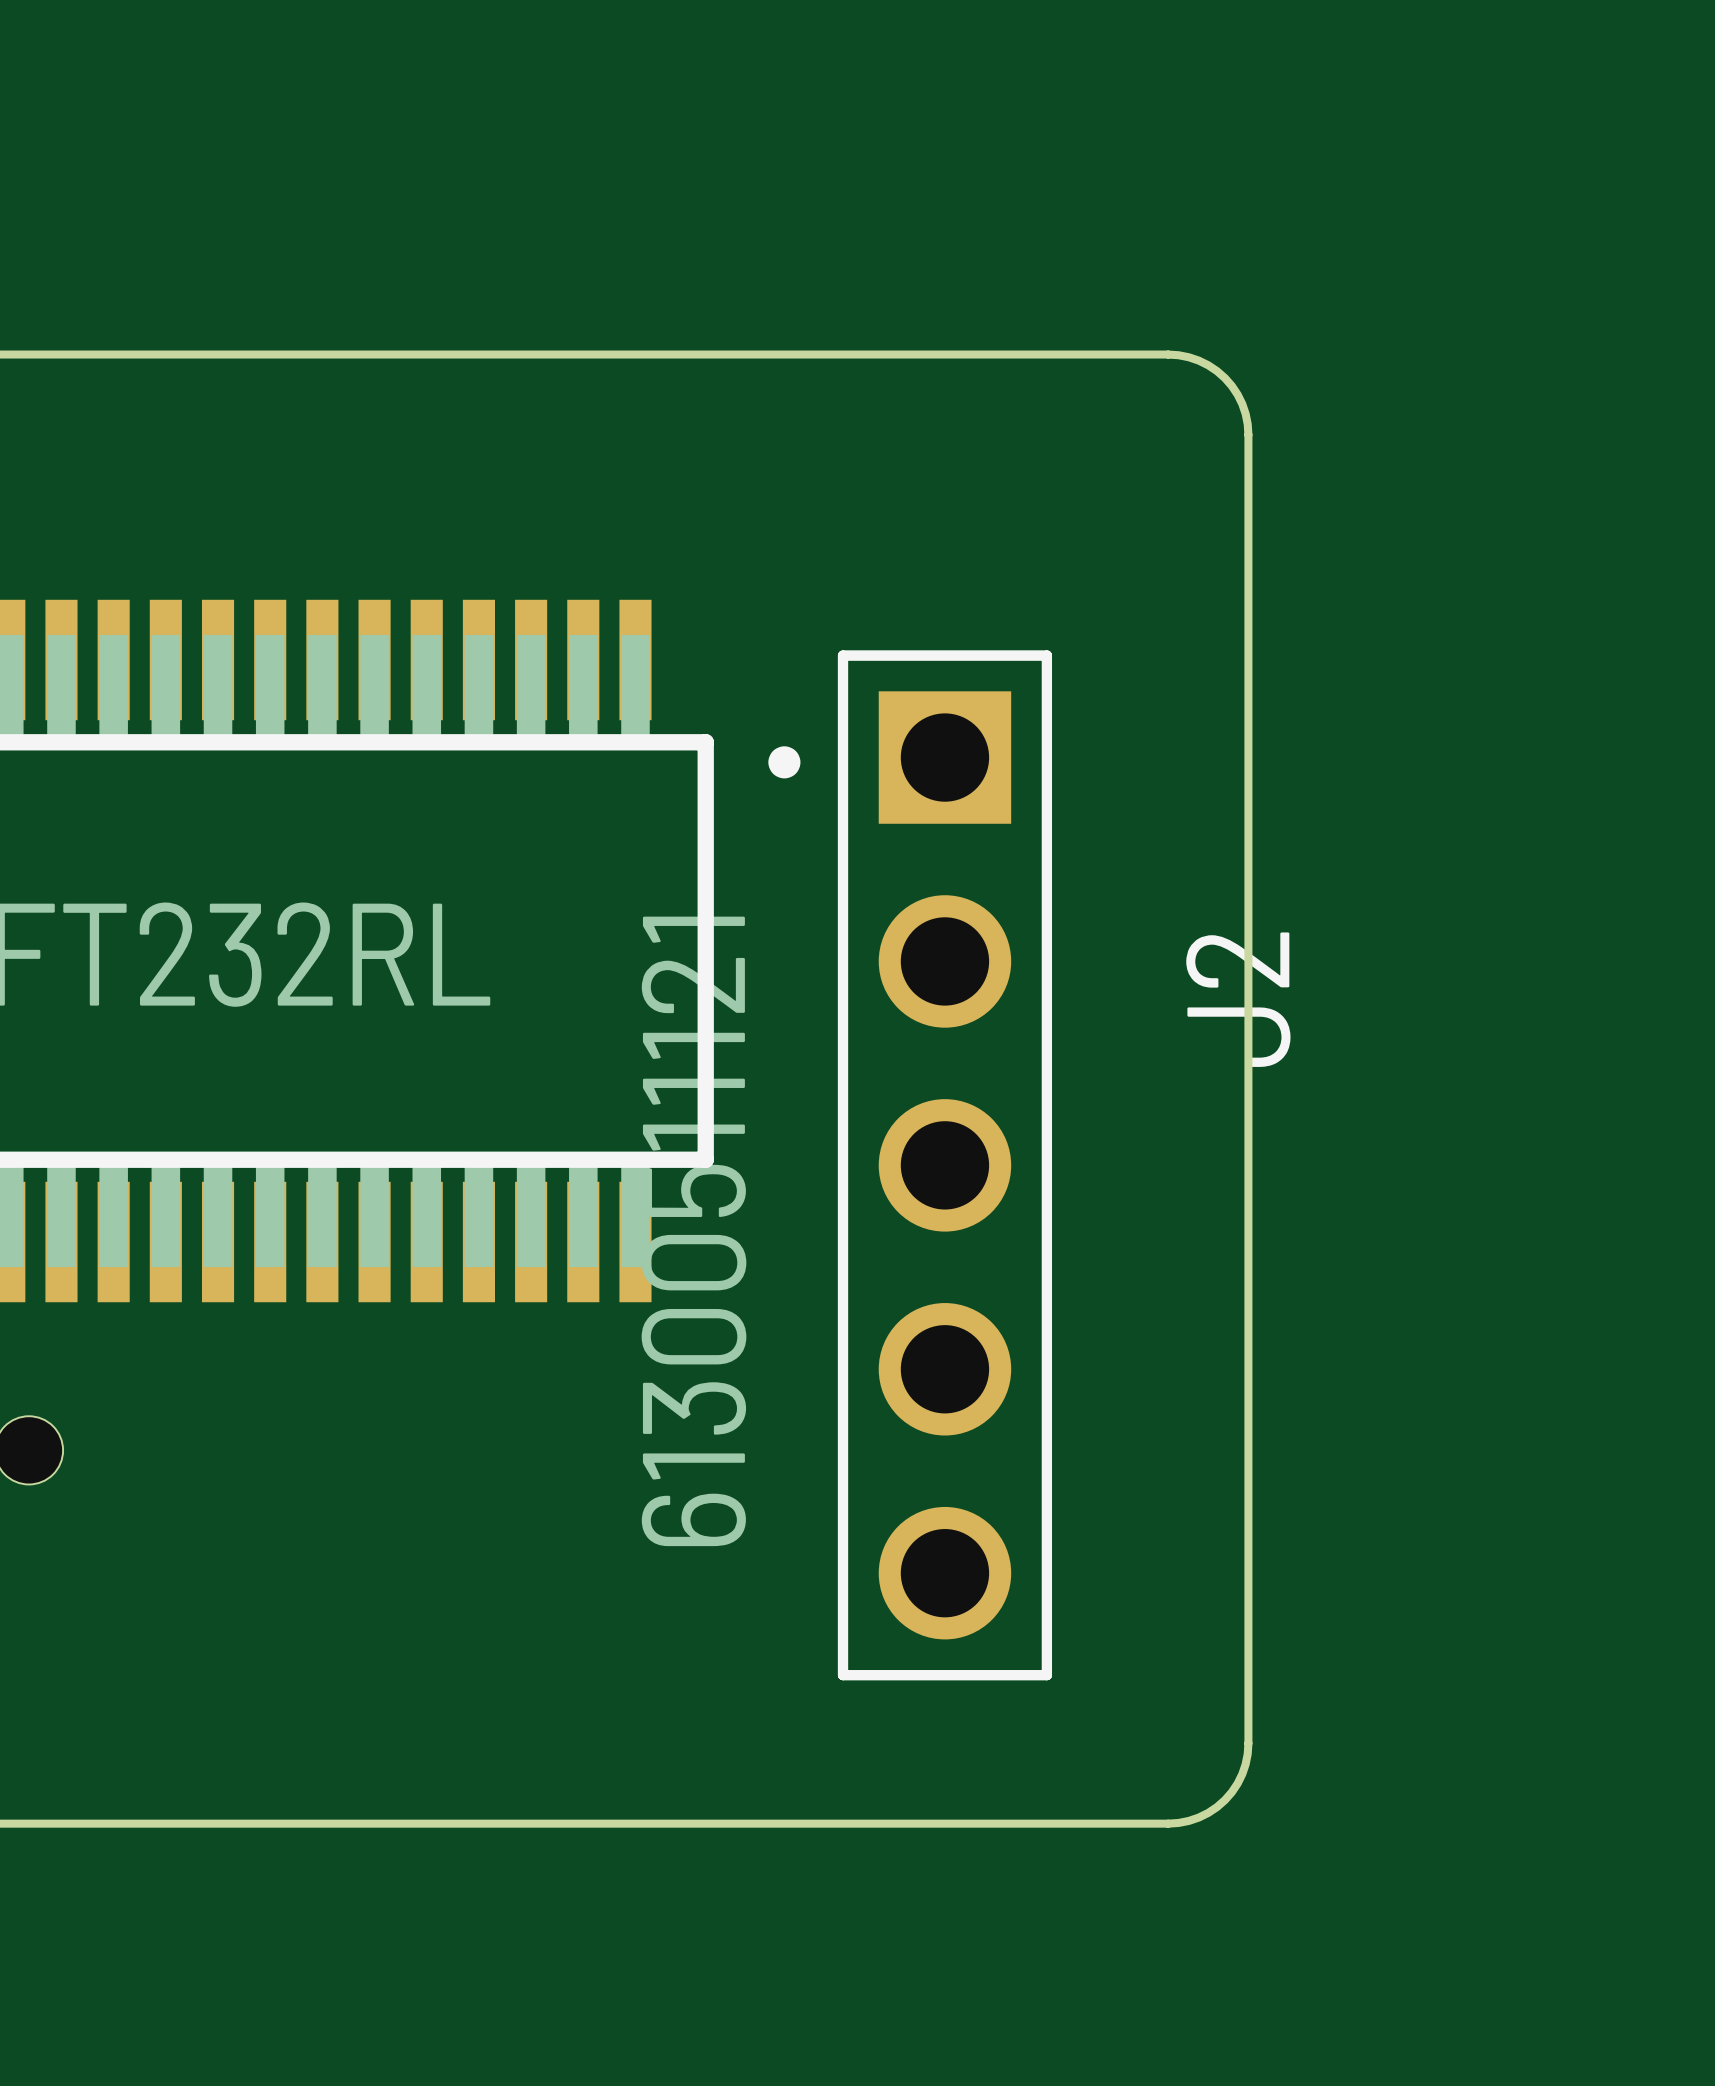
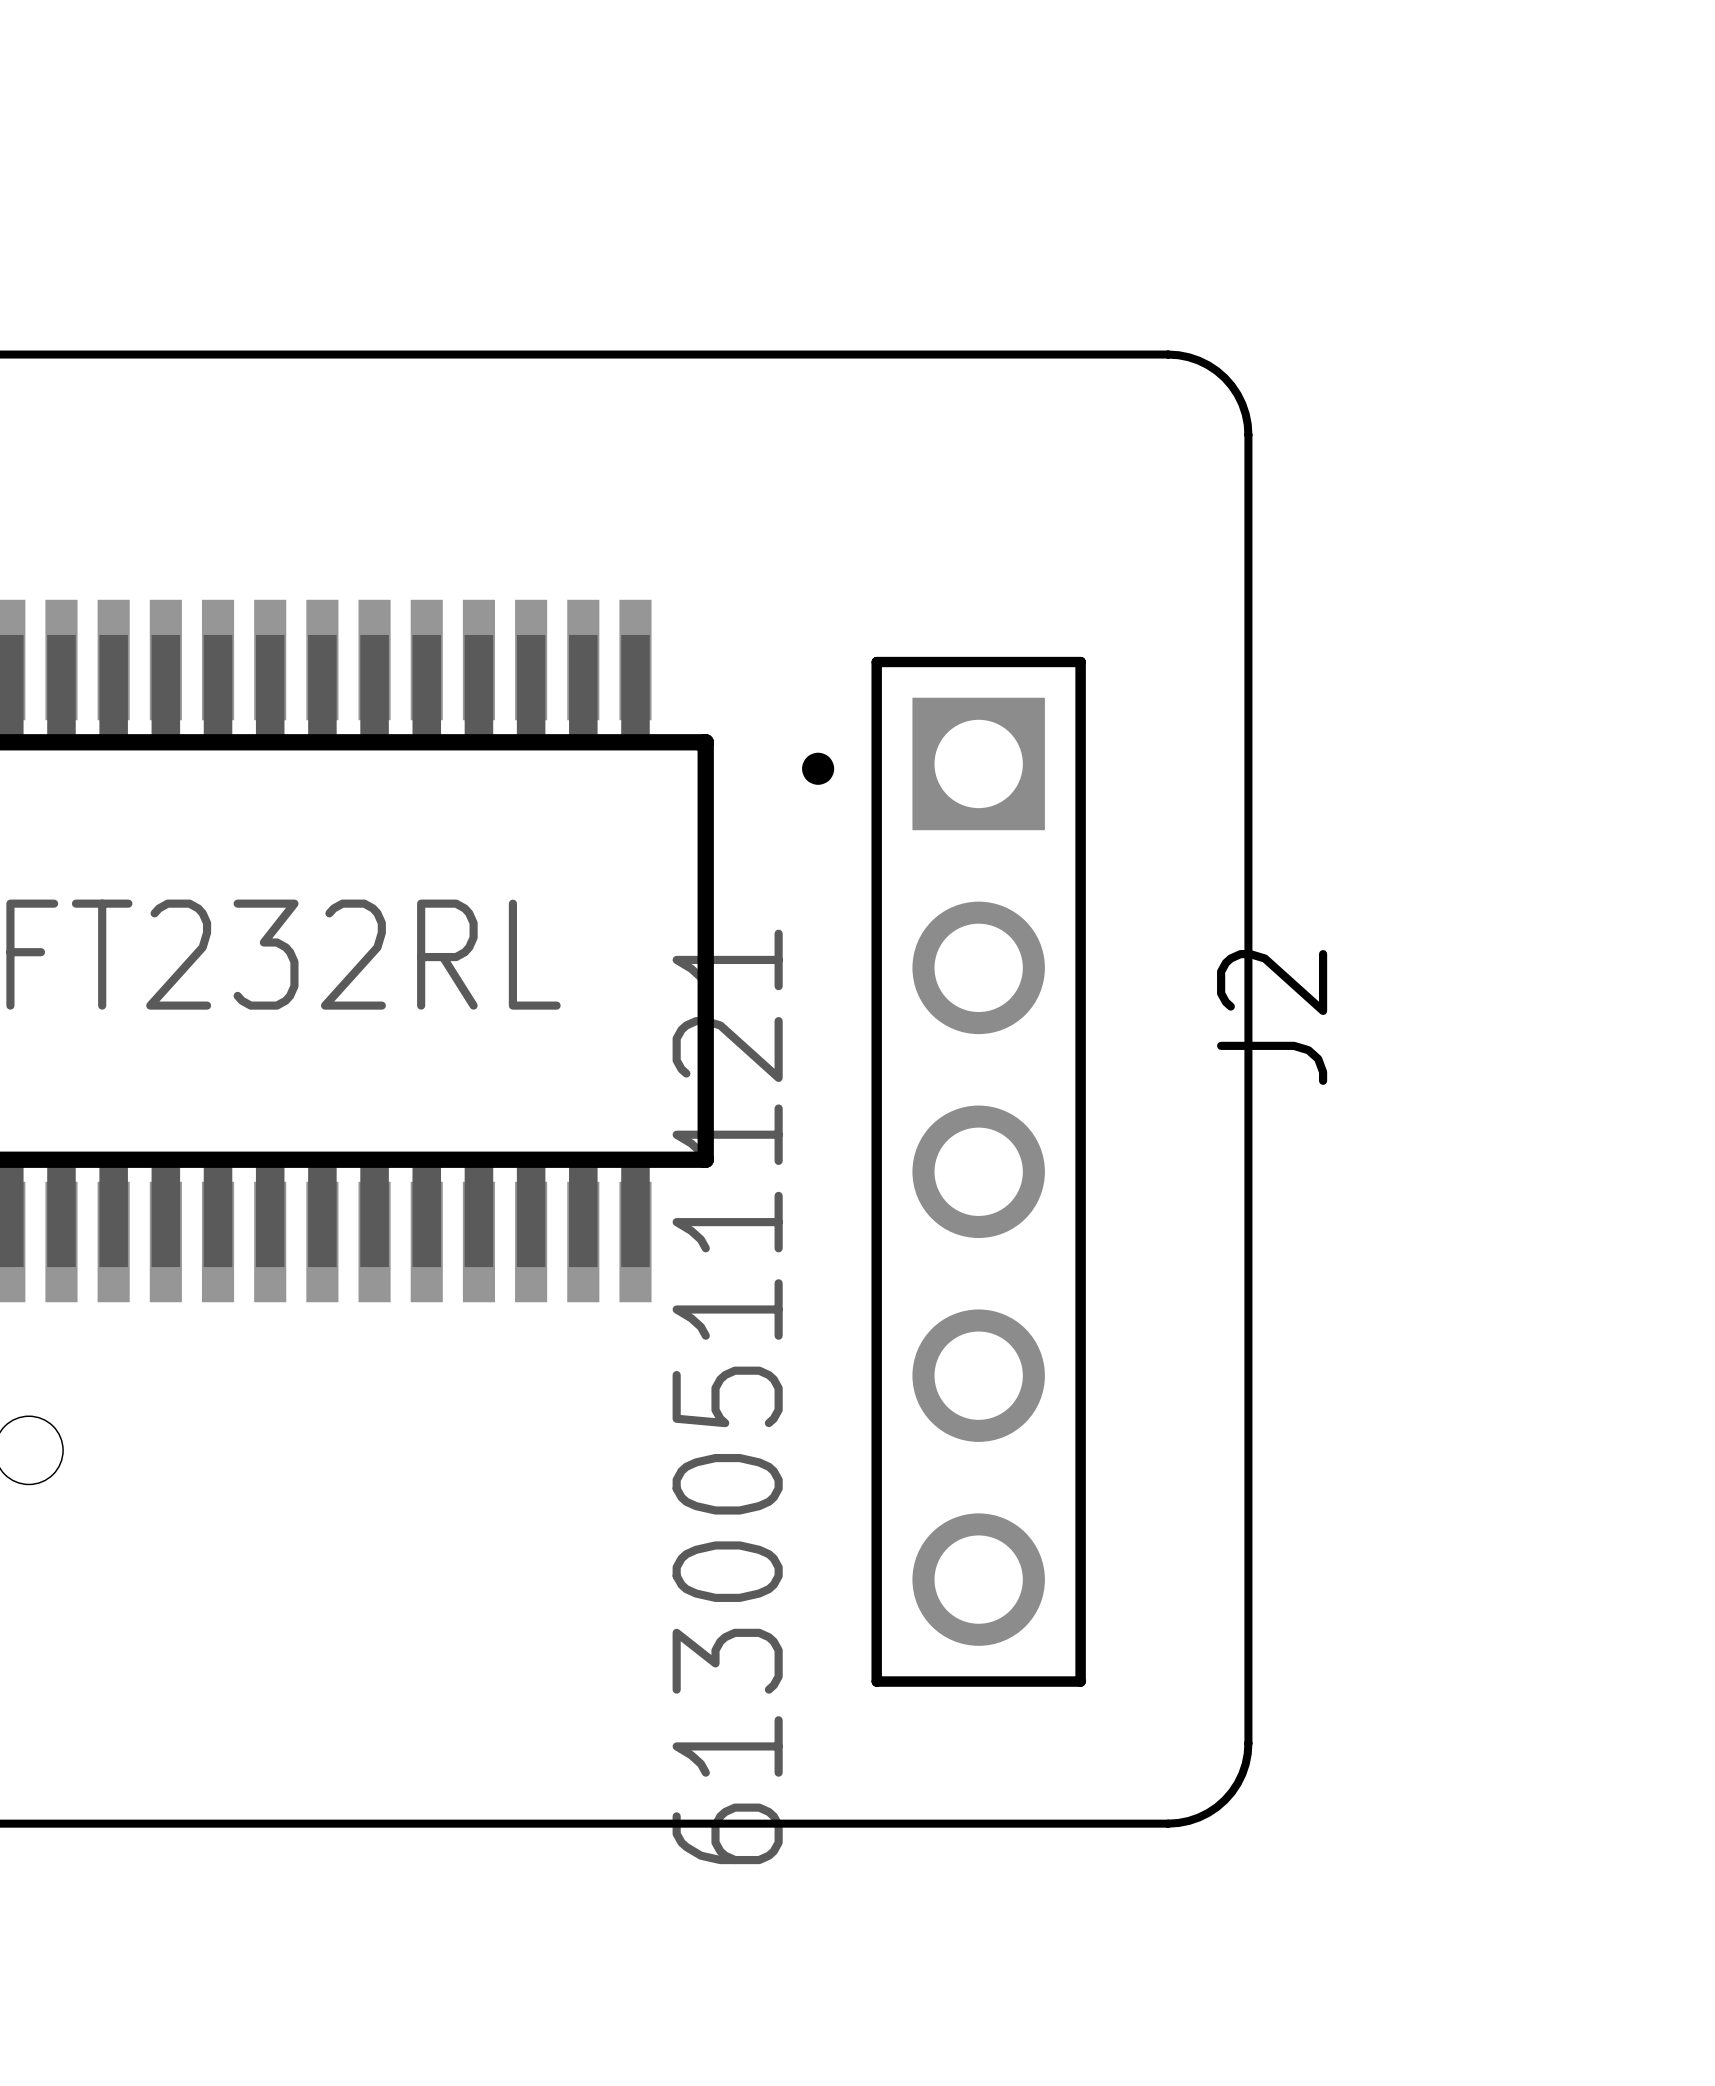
J2 position: (910, 1165) -> (943, 1171)

